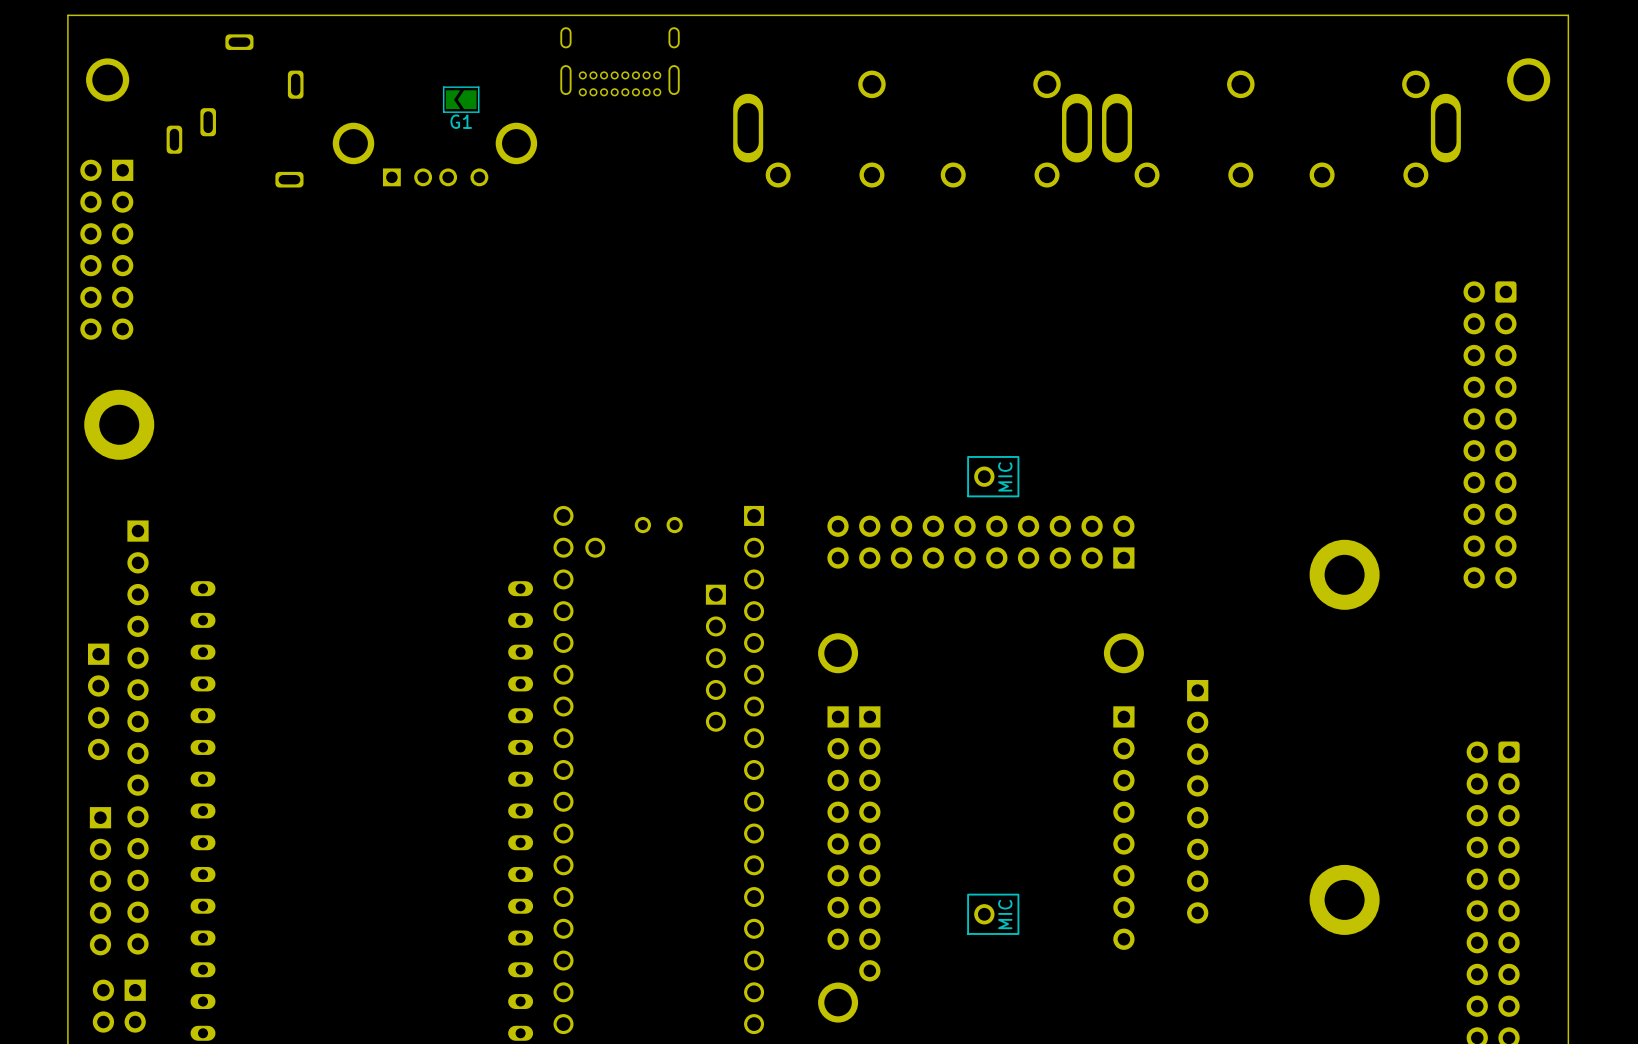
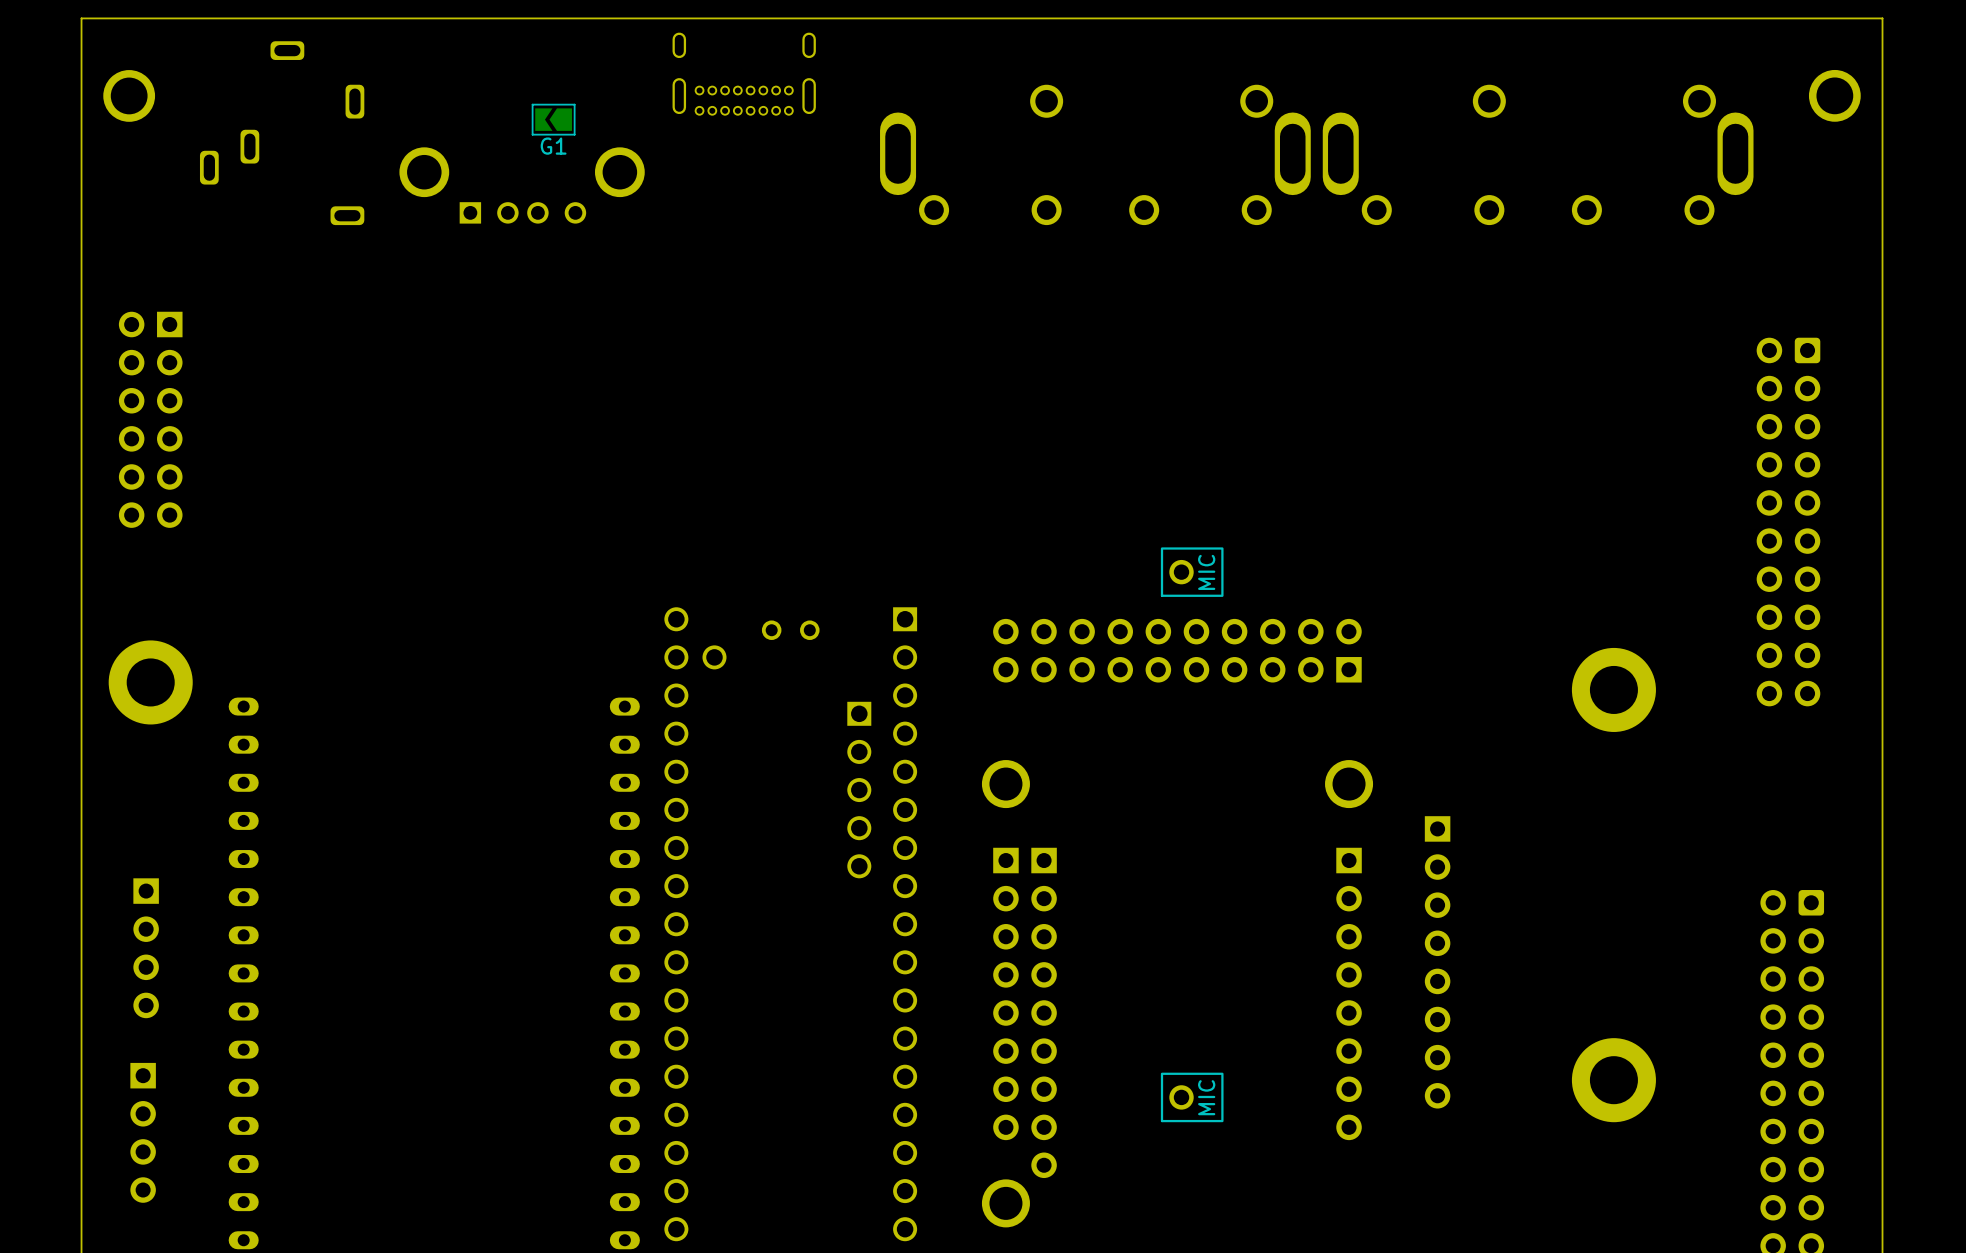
part position: (106, 249) -> (150, 419)
part position: (119, 424) -> (150, 682)
part position: (98, 701) -> (146, 948)
part: (138, 737) -> none
part: (100, 881) -> none
part: none -> (143, 1132)
part: (119, 1006) -> none

